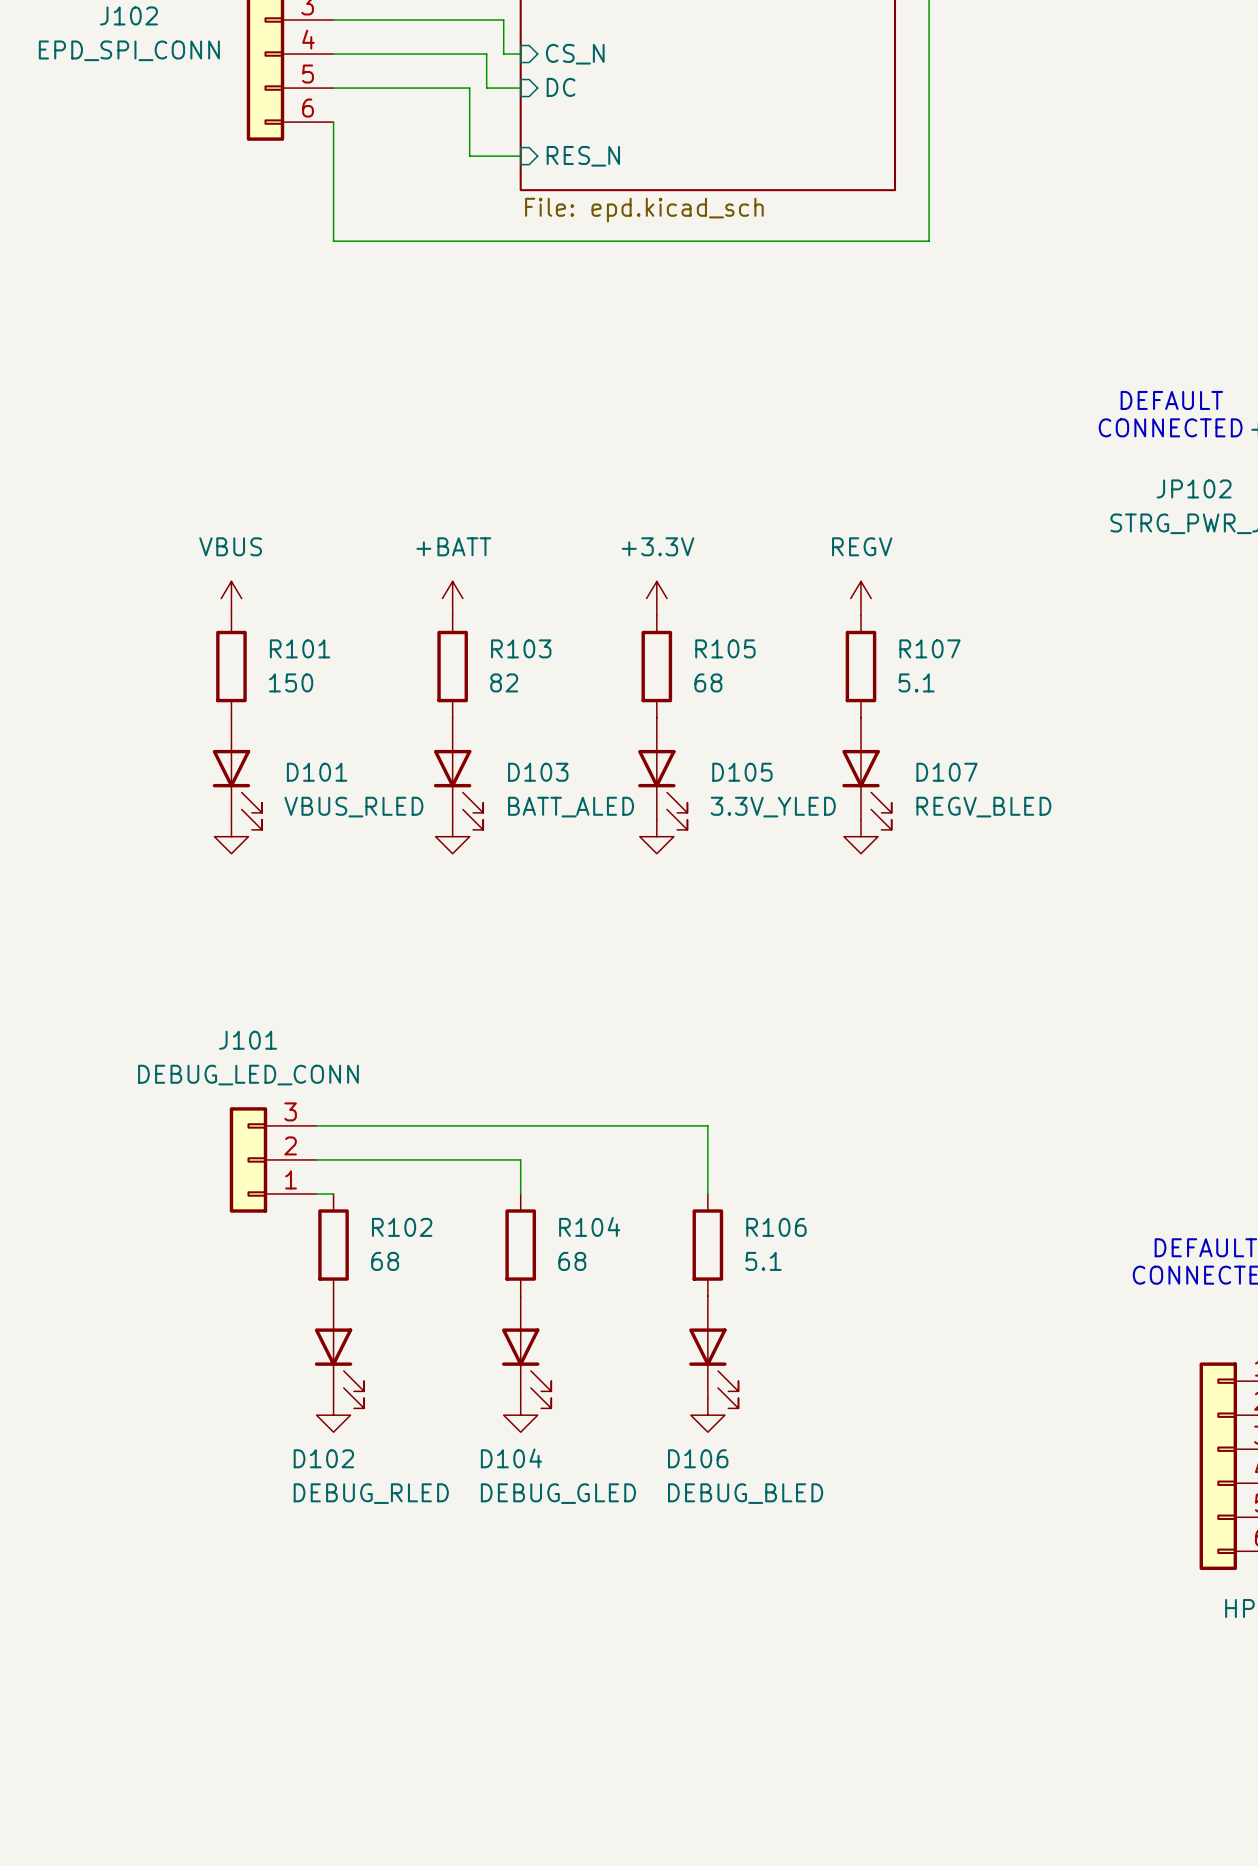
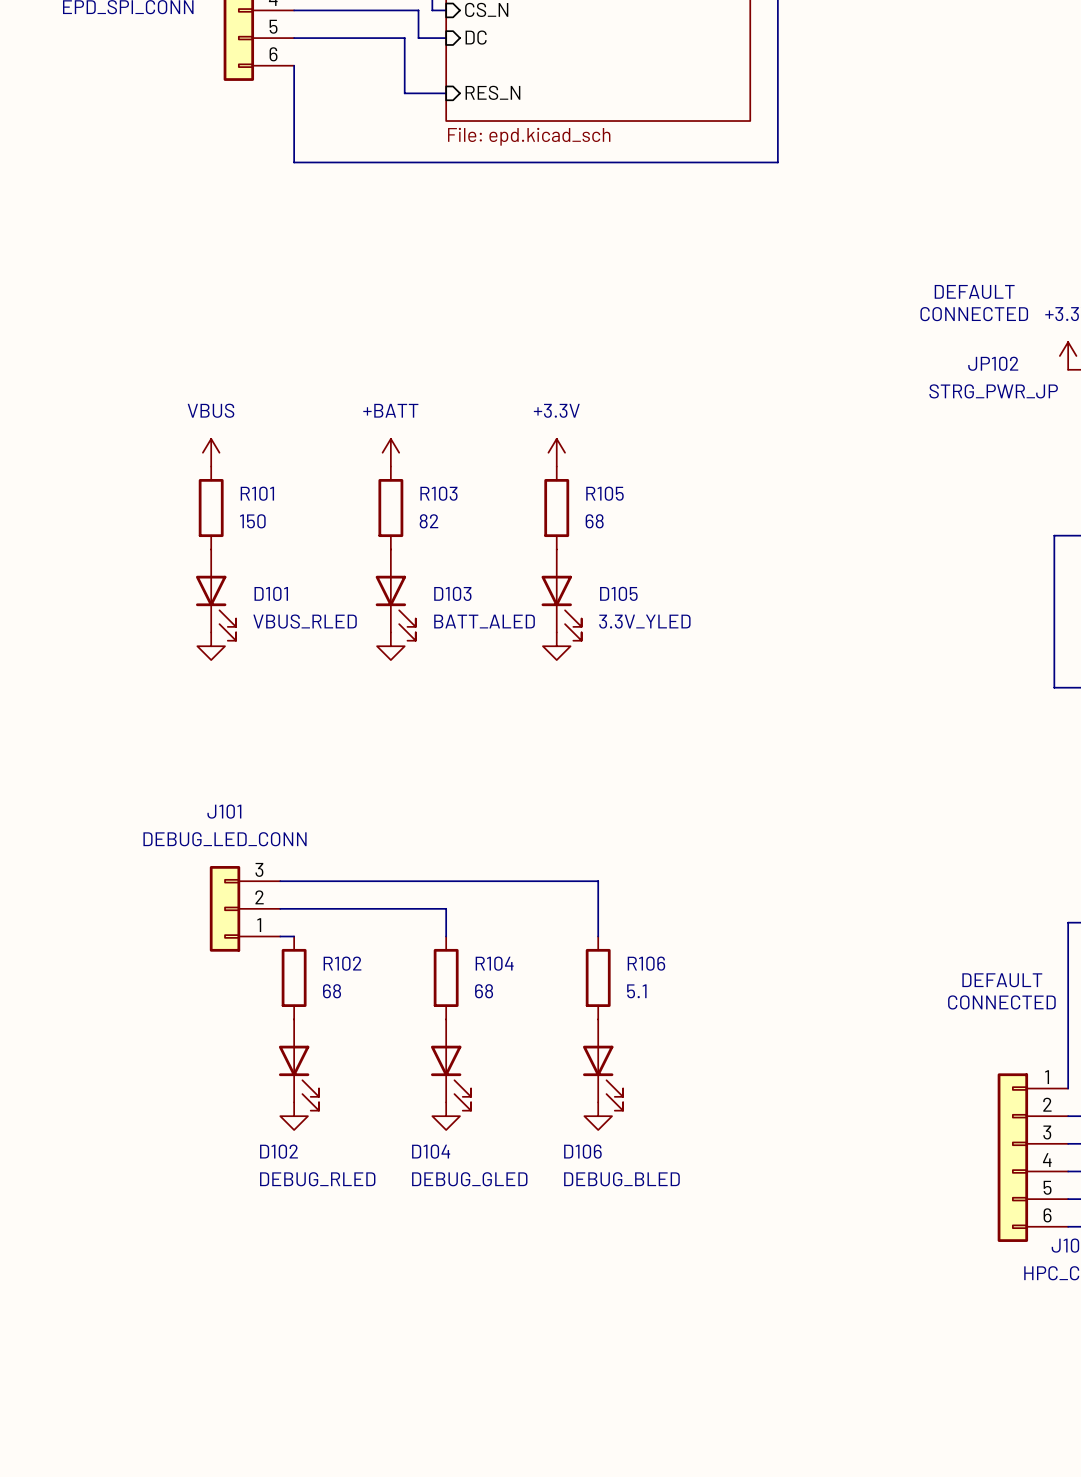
power symbol: REGV (860, 598) -> none
R107: 5.1 (860, 666) -> none
D107: REGV_BLED (866, 773) -> none
power symbol: (860, 836) -> none

